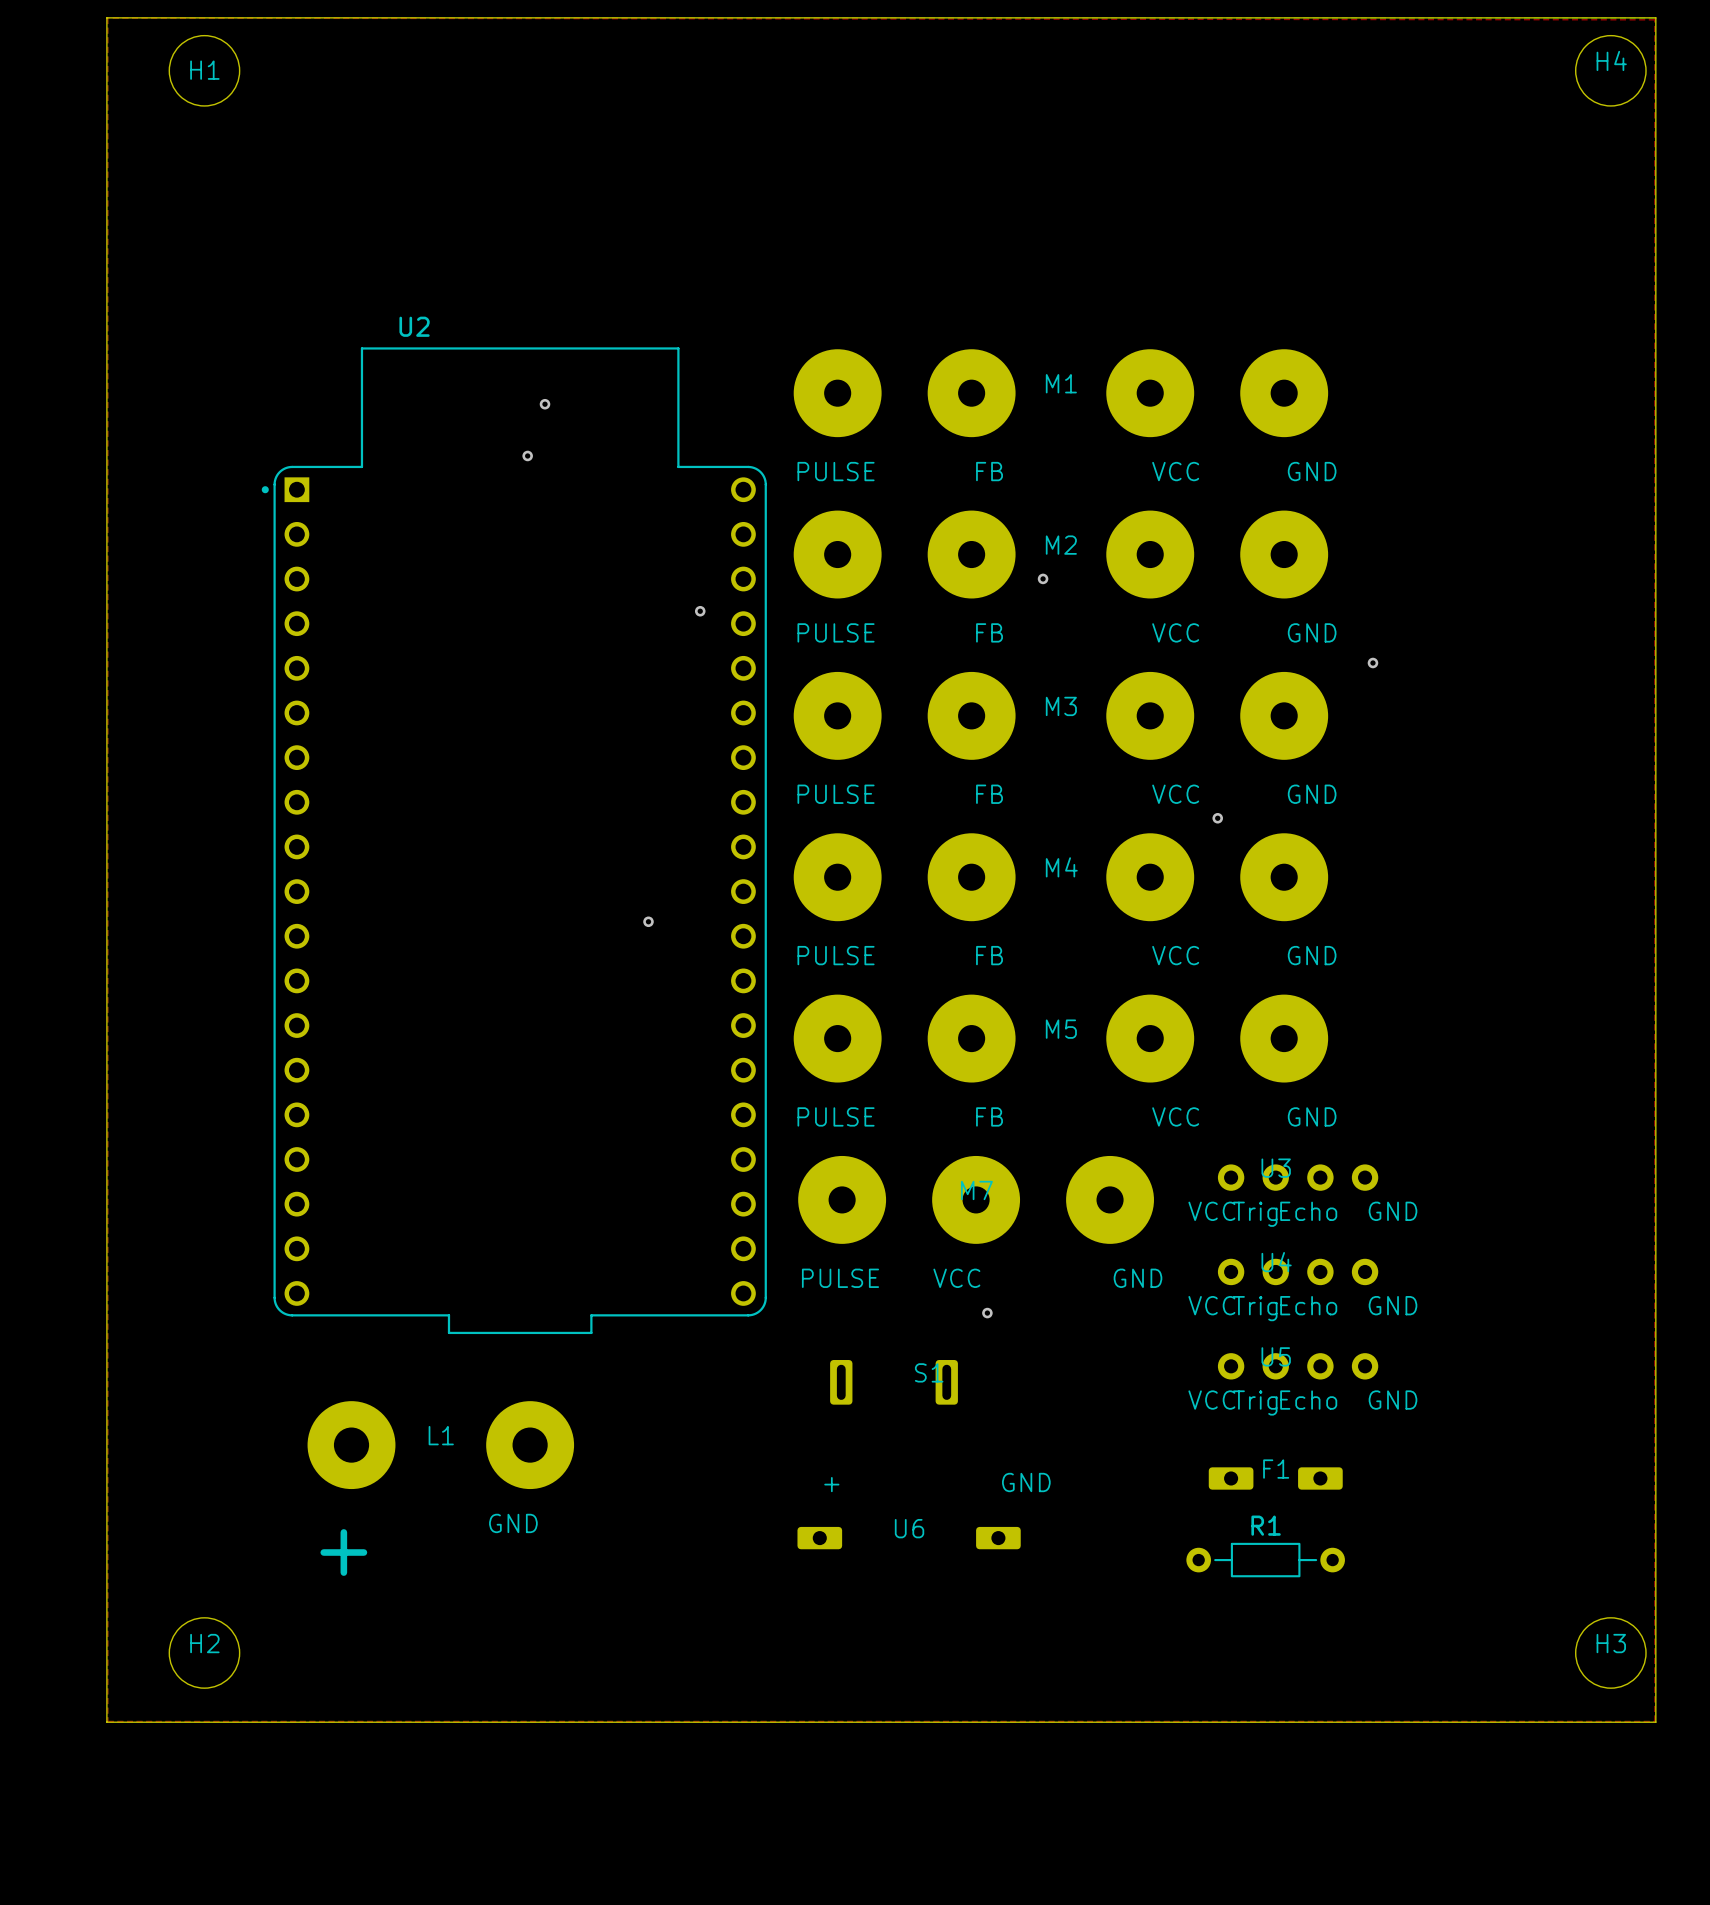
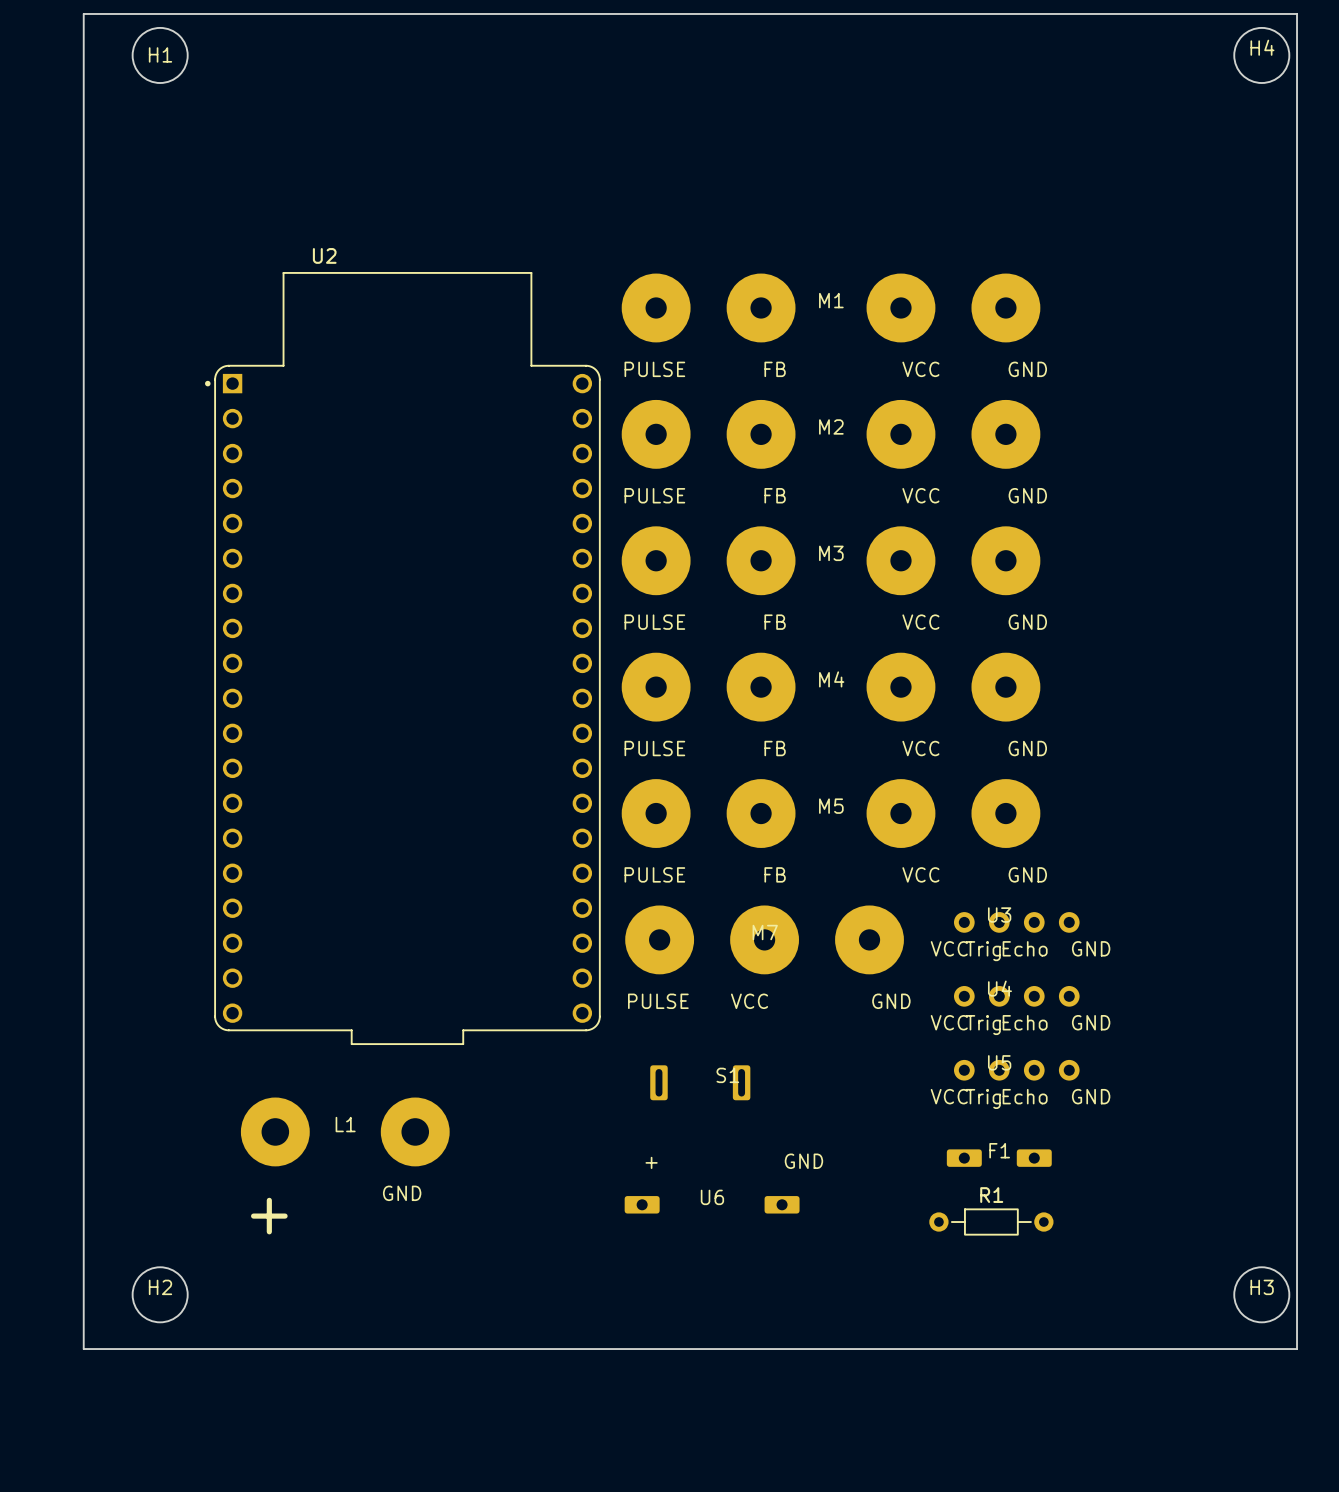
top zone outline: (1654, 18) (1654, 1721) (107, 1721) (107, 18) (1654, 19) -> none
via: (545, 404) -> none
via: (527, 455) -> none
via: (1043, 578) -> none
via: (700, 611) -> none
via: (1372, 663) -> none
via: (1217, 818) -> none
via: (648, 921) -> none
via: (987, 1313) -> none

